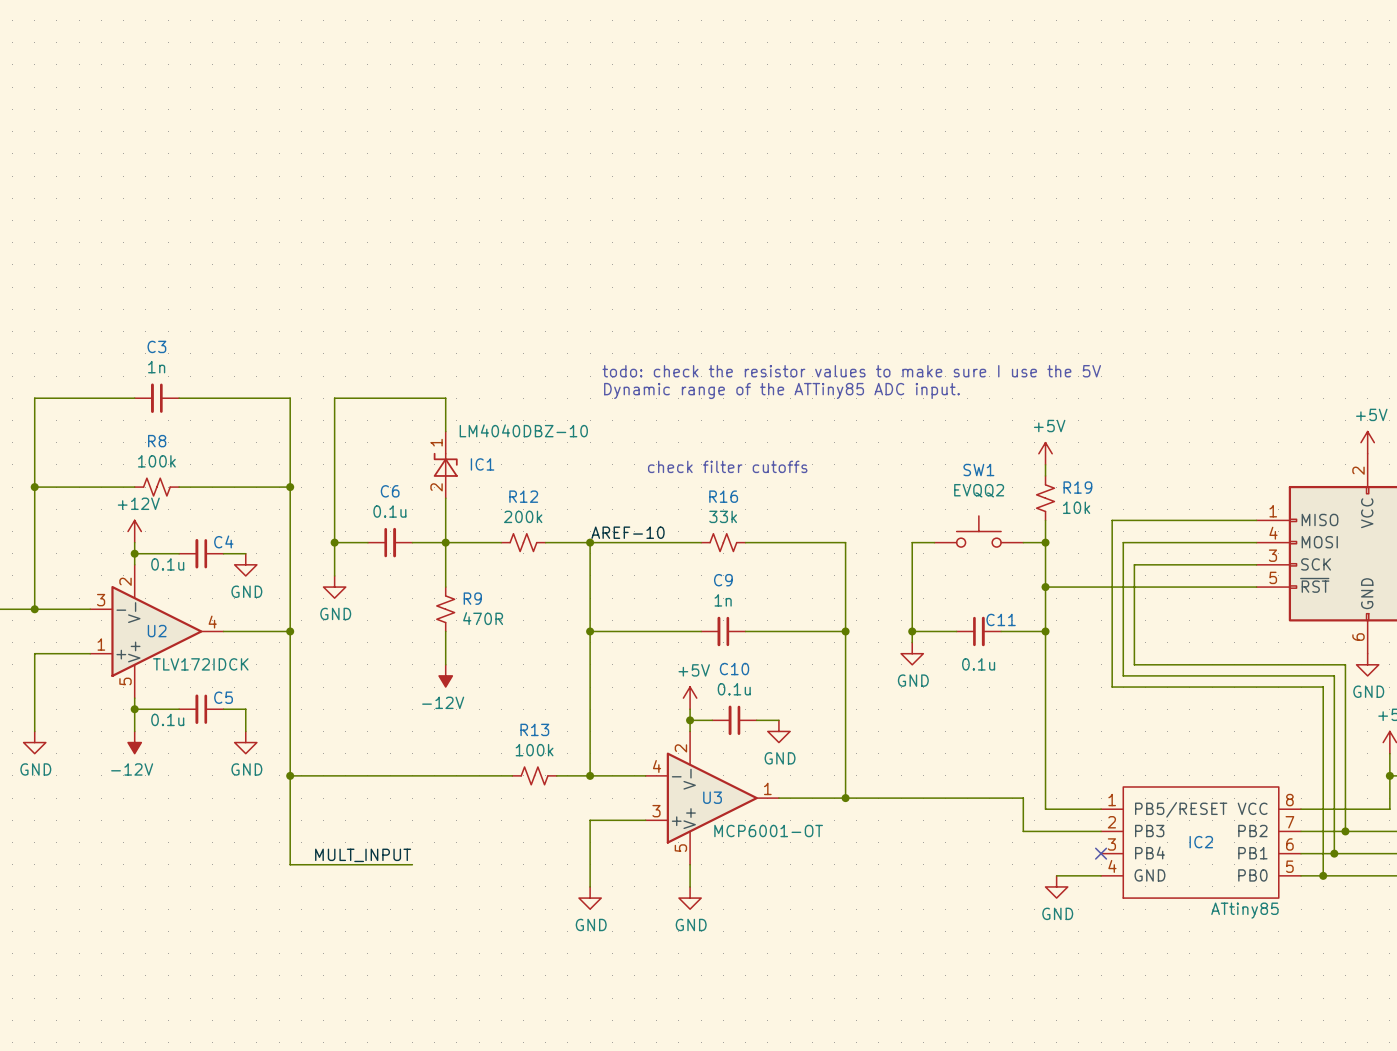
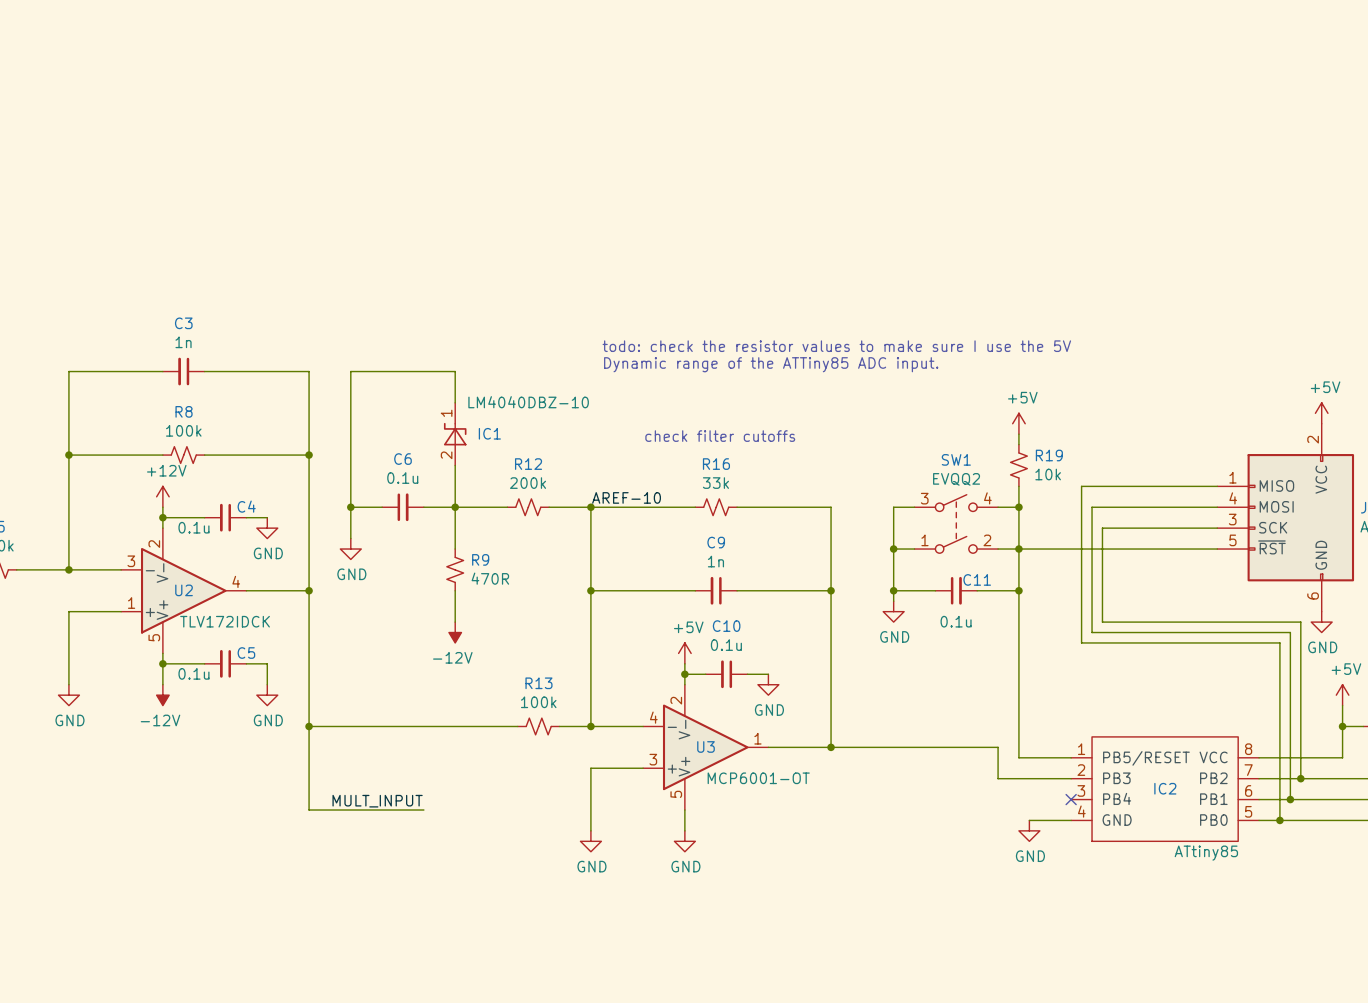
SW1 symbol: [934, 515, 1024, 548] -> [914, 494, 999, 554]
wire: none -> (893, 549) (914, 549)
junction: none -> (893, 549)
wire: none -> (998, 549) (1018, 549)

